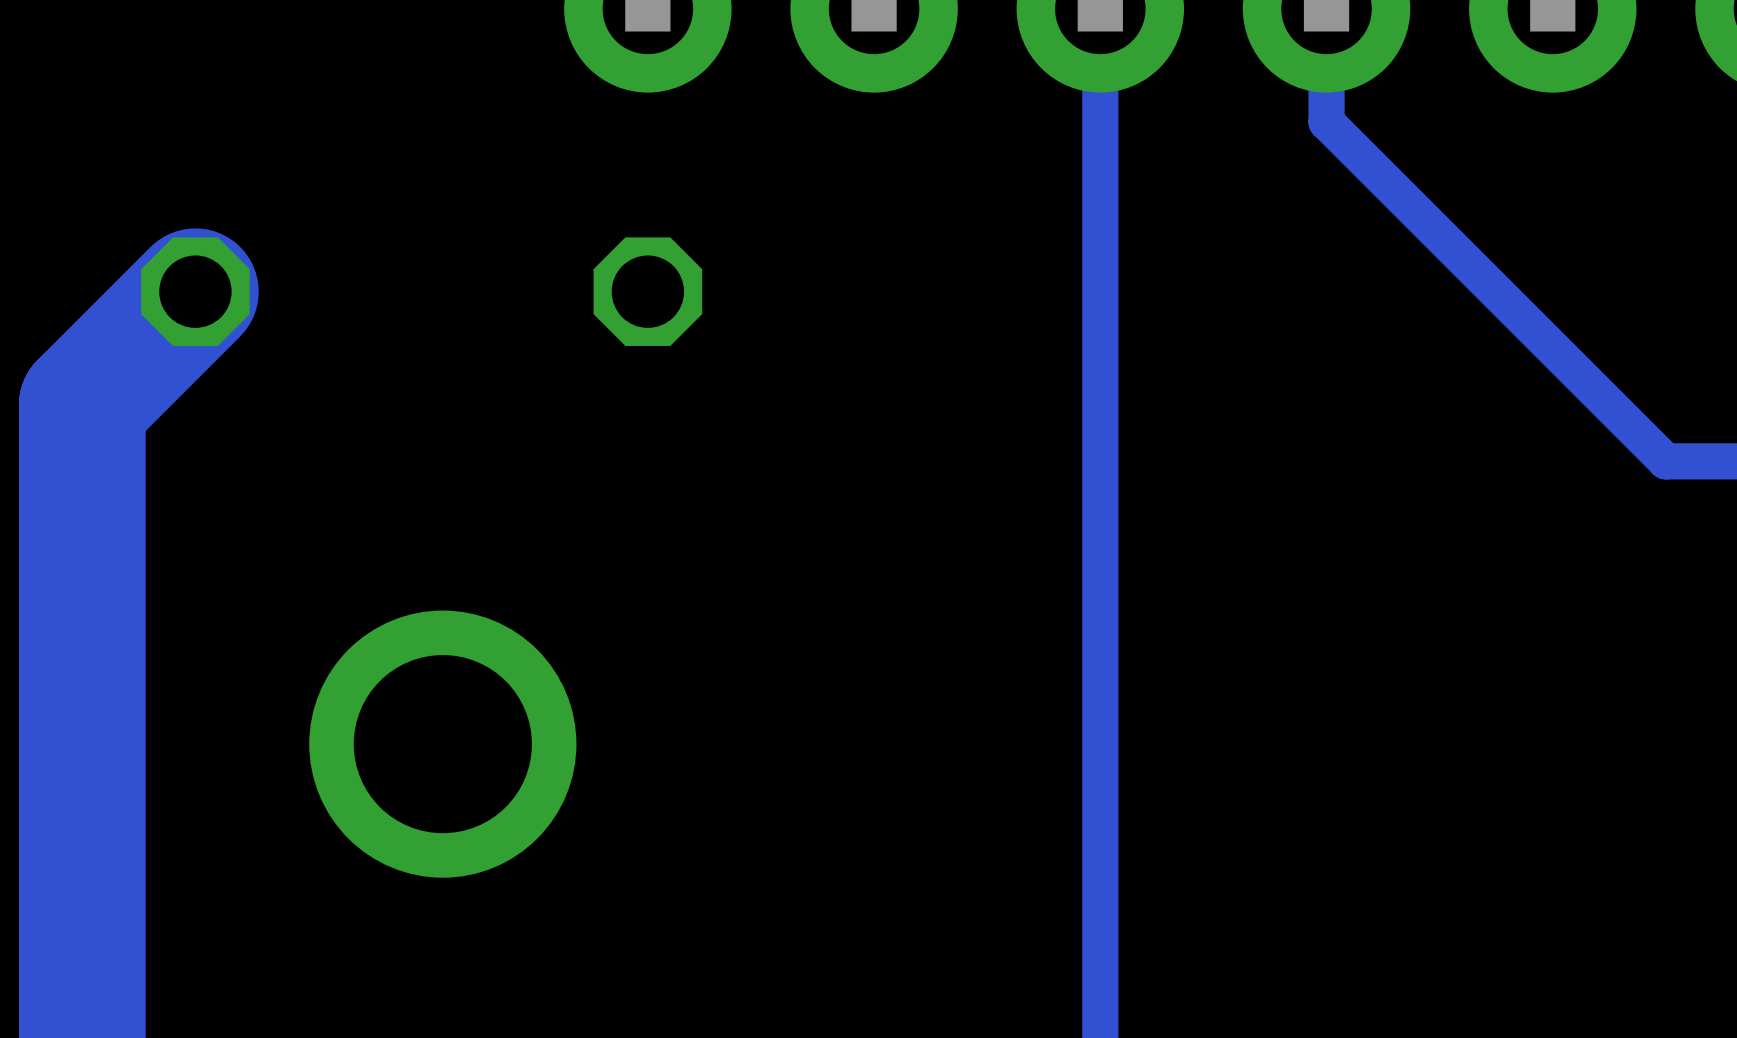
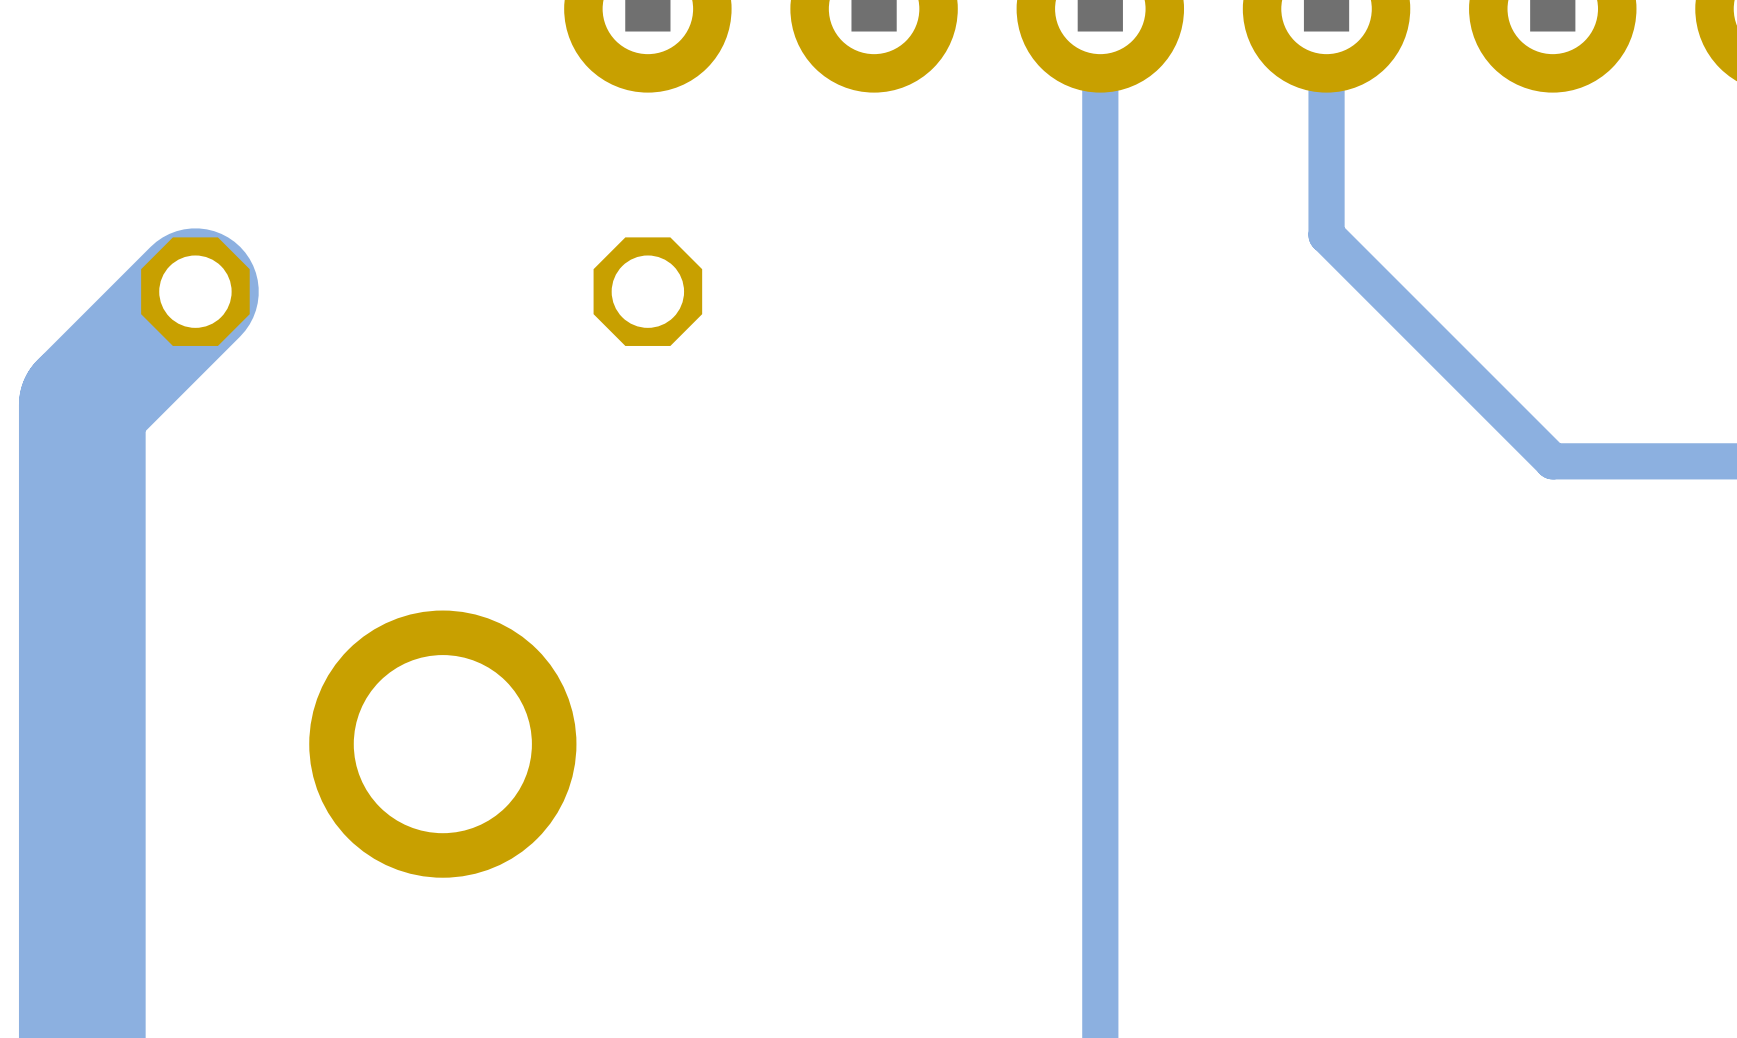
track: (1326, 122) (1665, 461) -> (1326, 122) (1326, 235) (1552, 461) (1665, 461)

